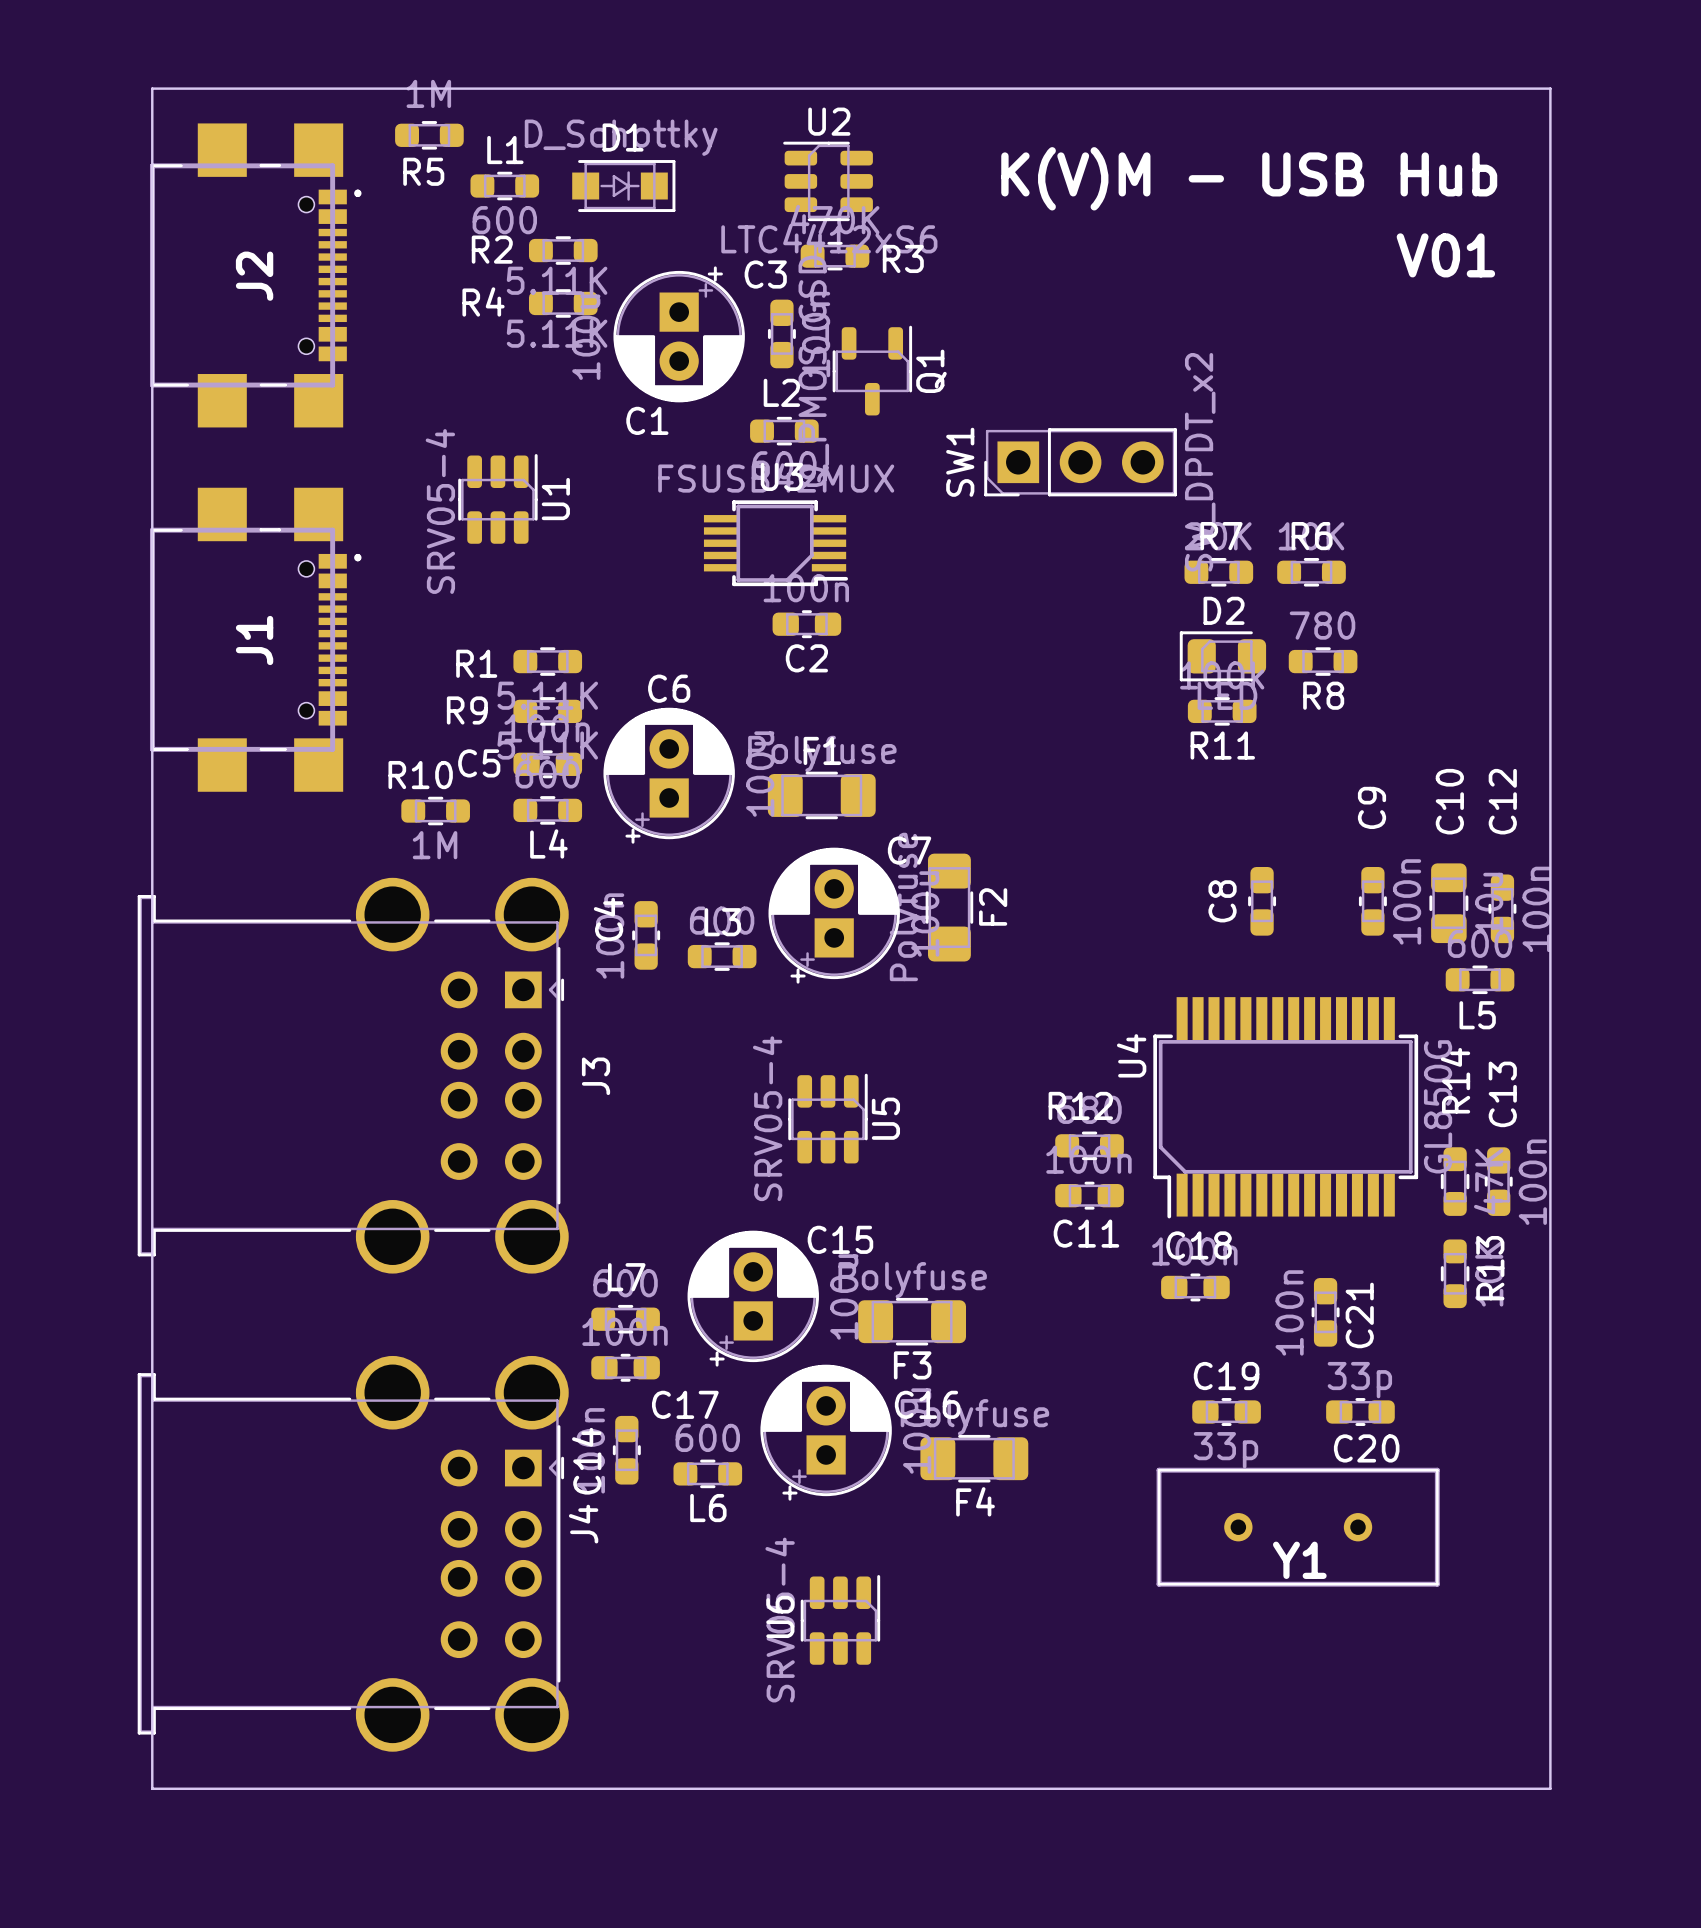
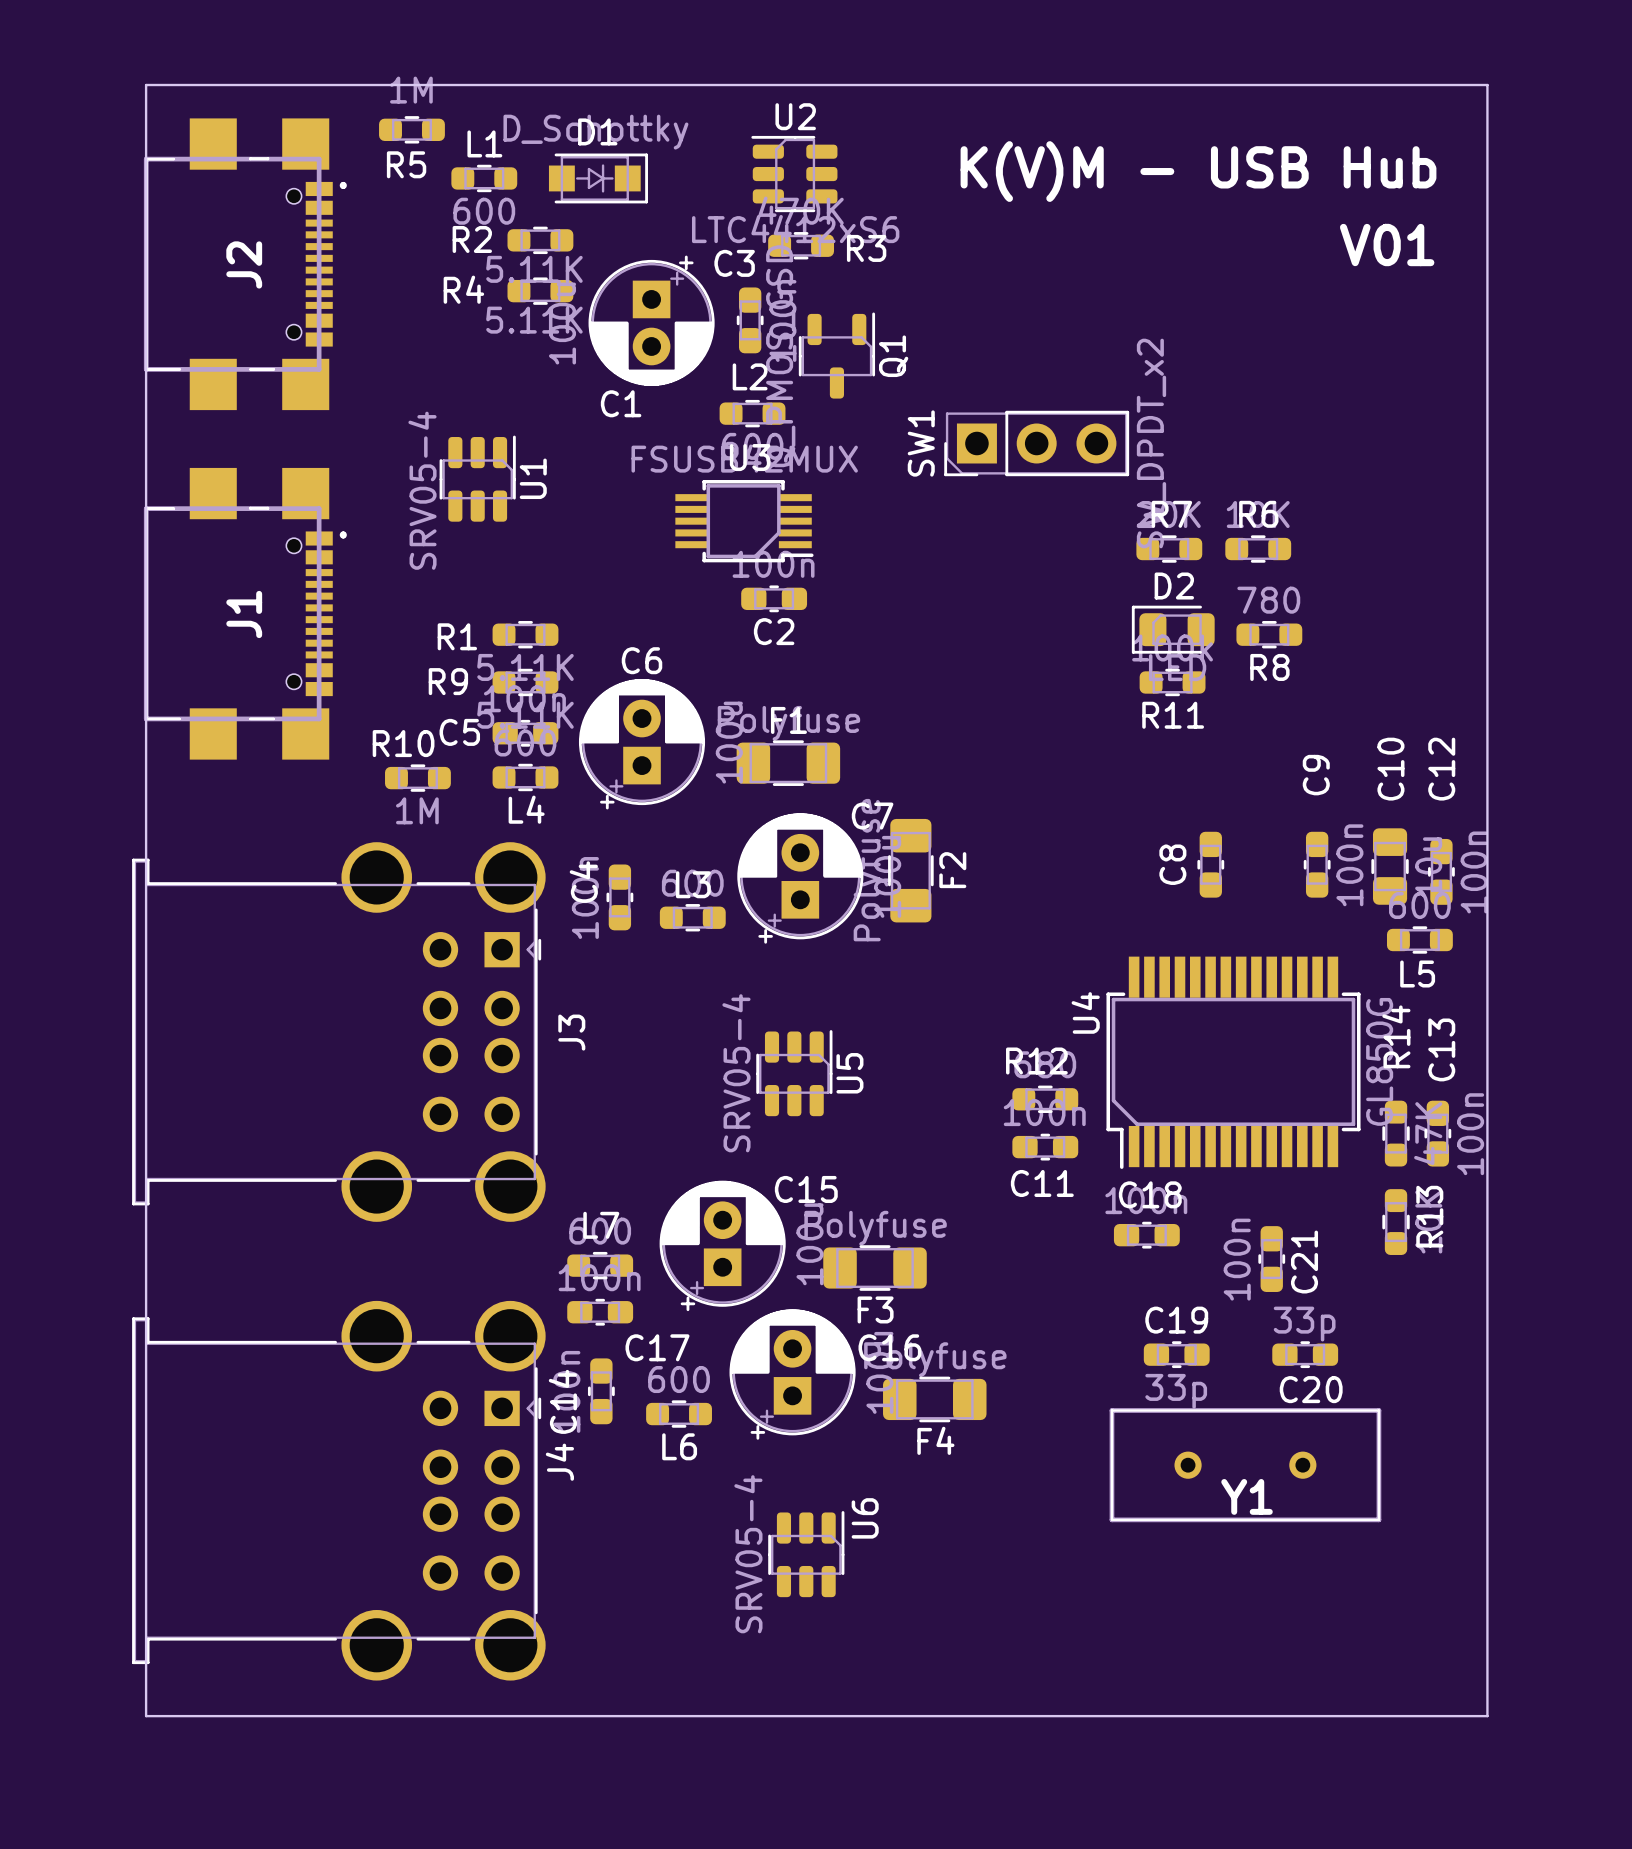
U6 name position: U6 (780, 1616) -> U6 (865, 1518)

